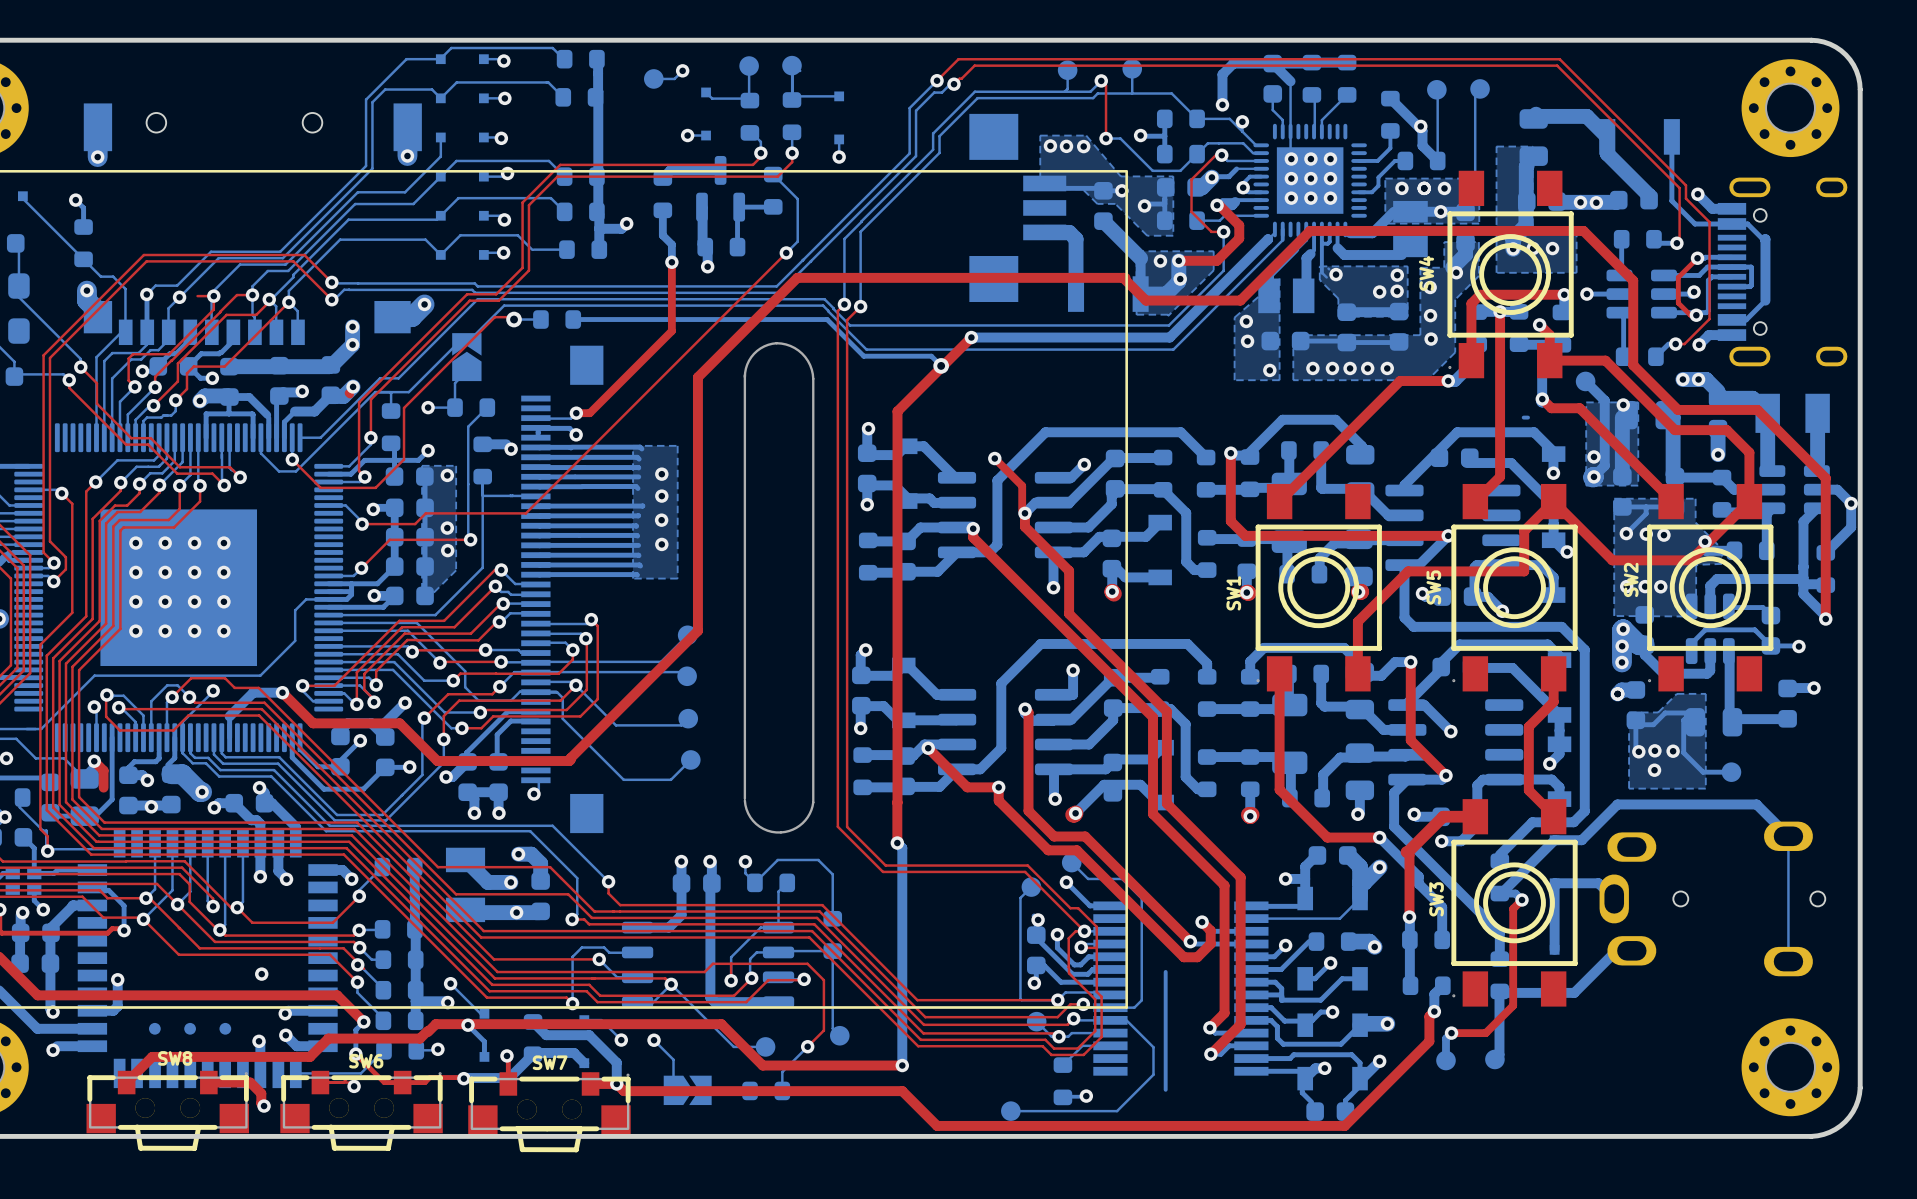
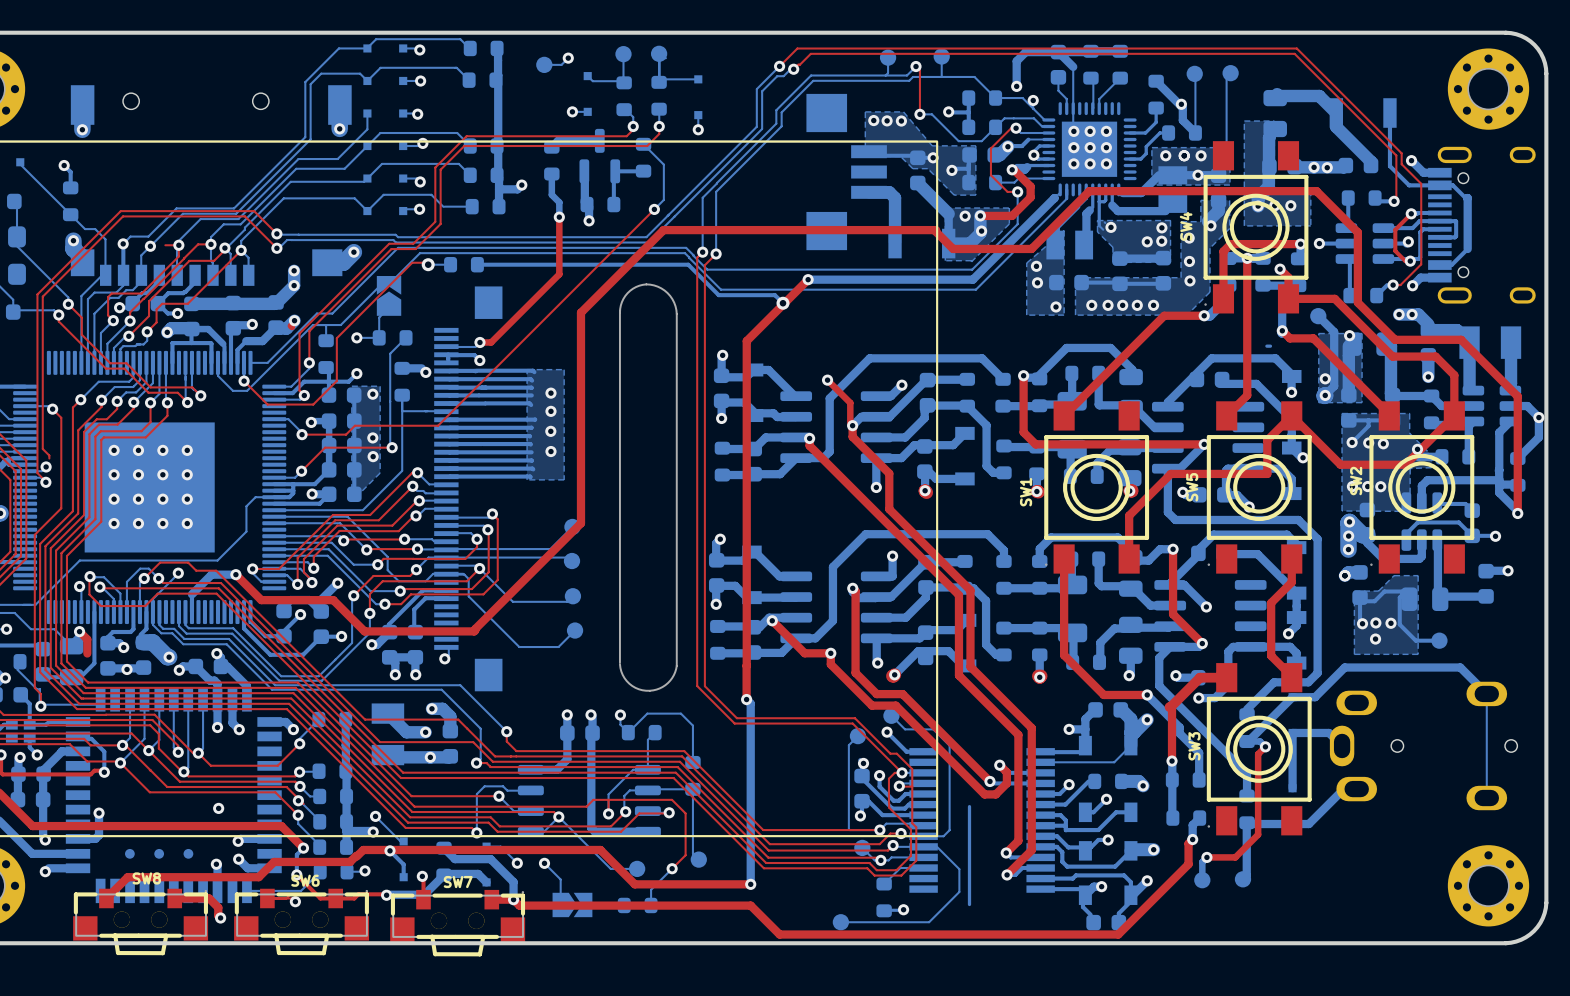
top track: (57, 549) (65, 557) (65, 569) (53, 581) -> (49, 455) (49, 458)
top track: (43, 552) (54, 563) -> (37, 458) (37, 473) (47, 482)

